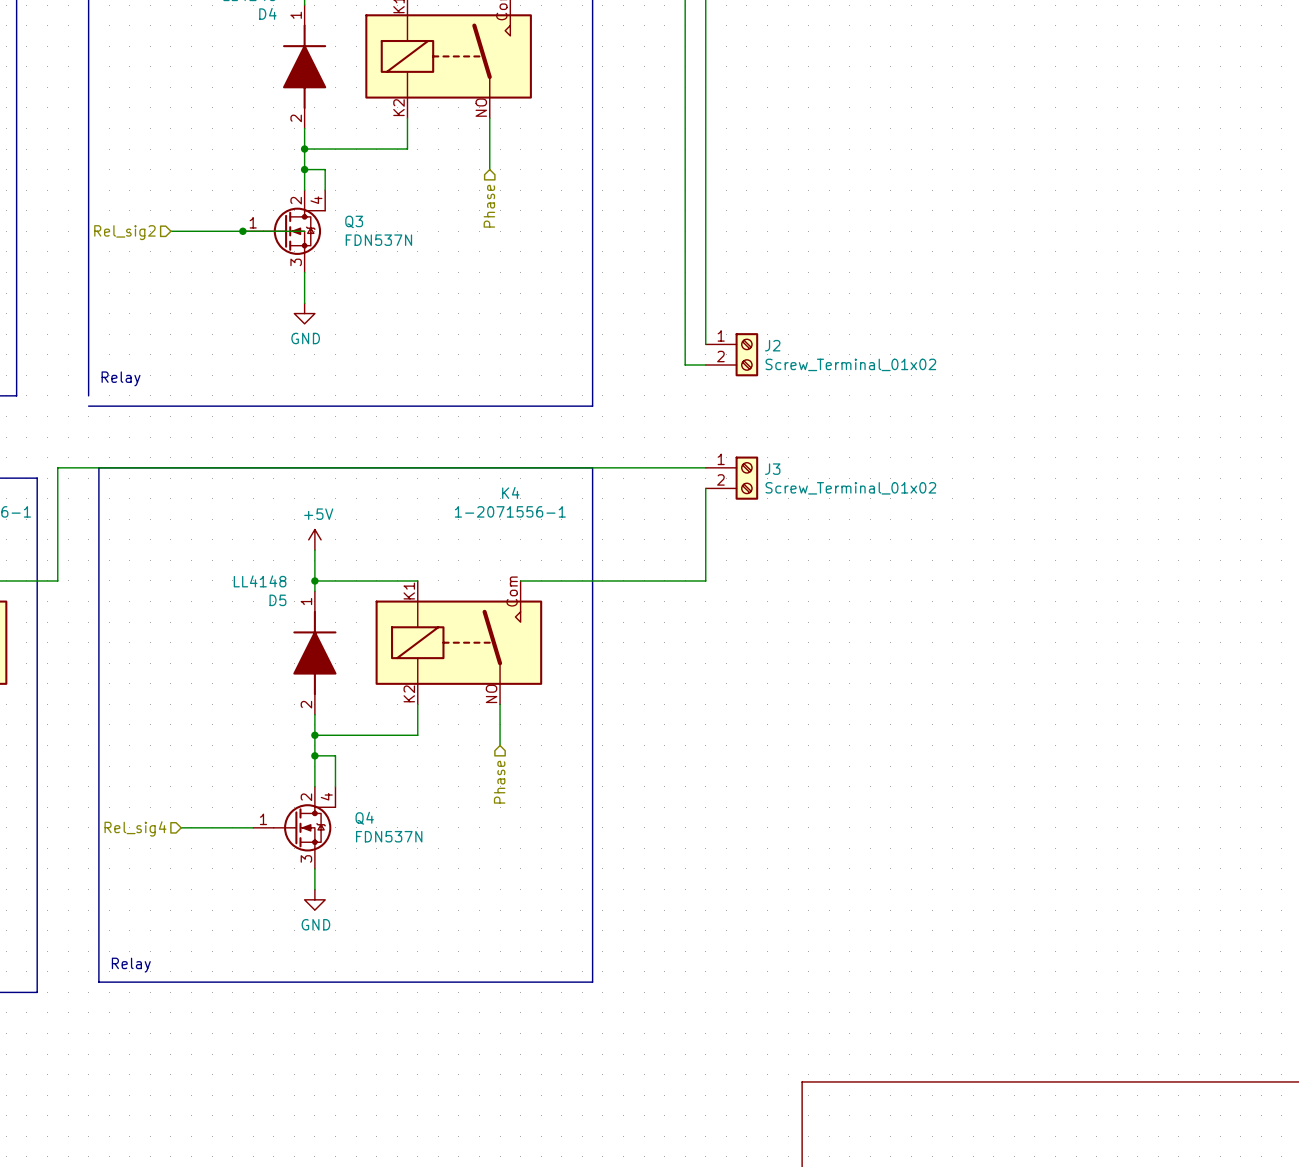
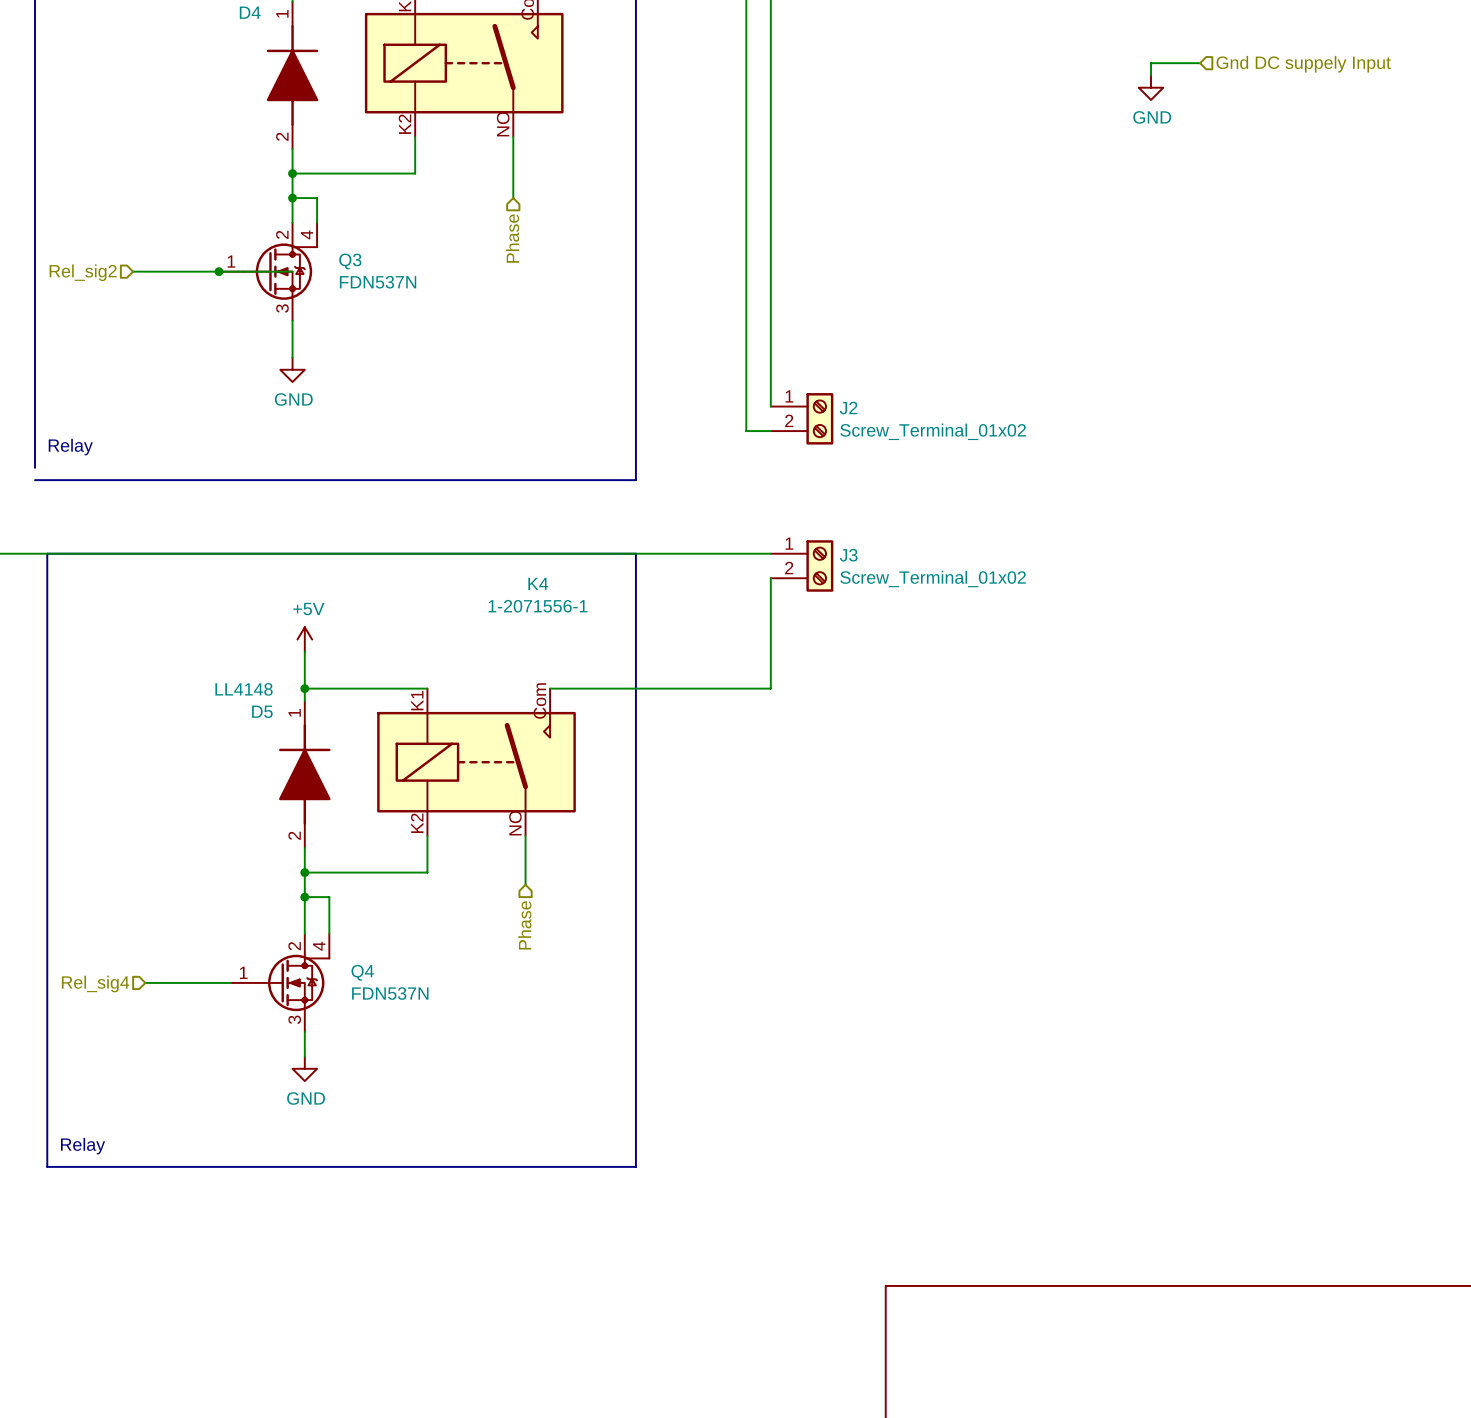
wire: none -> (1200, 63) (1151, 63) (1151, 75)
hierarchical label: none -> Gnd DC suppely Input (1303, 64)
power symbol: none -> GND (1151, 87)

